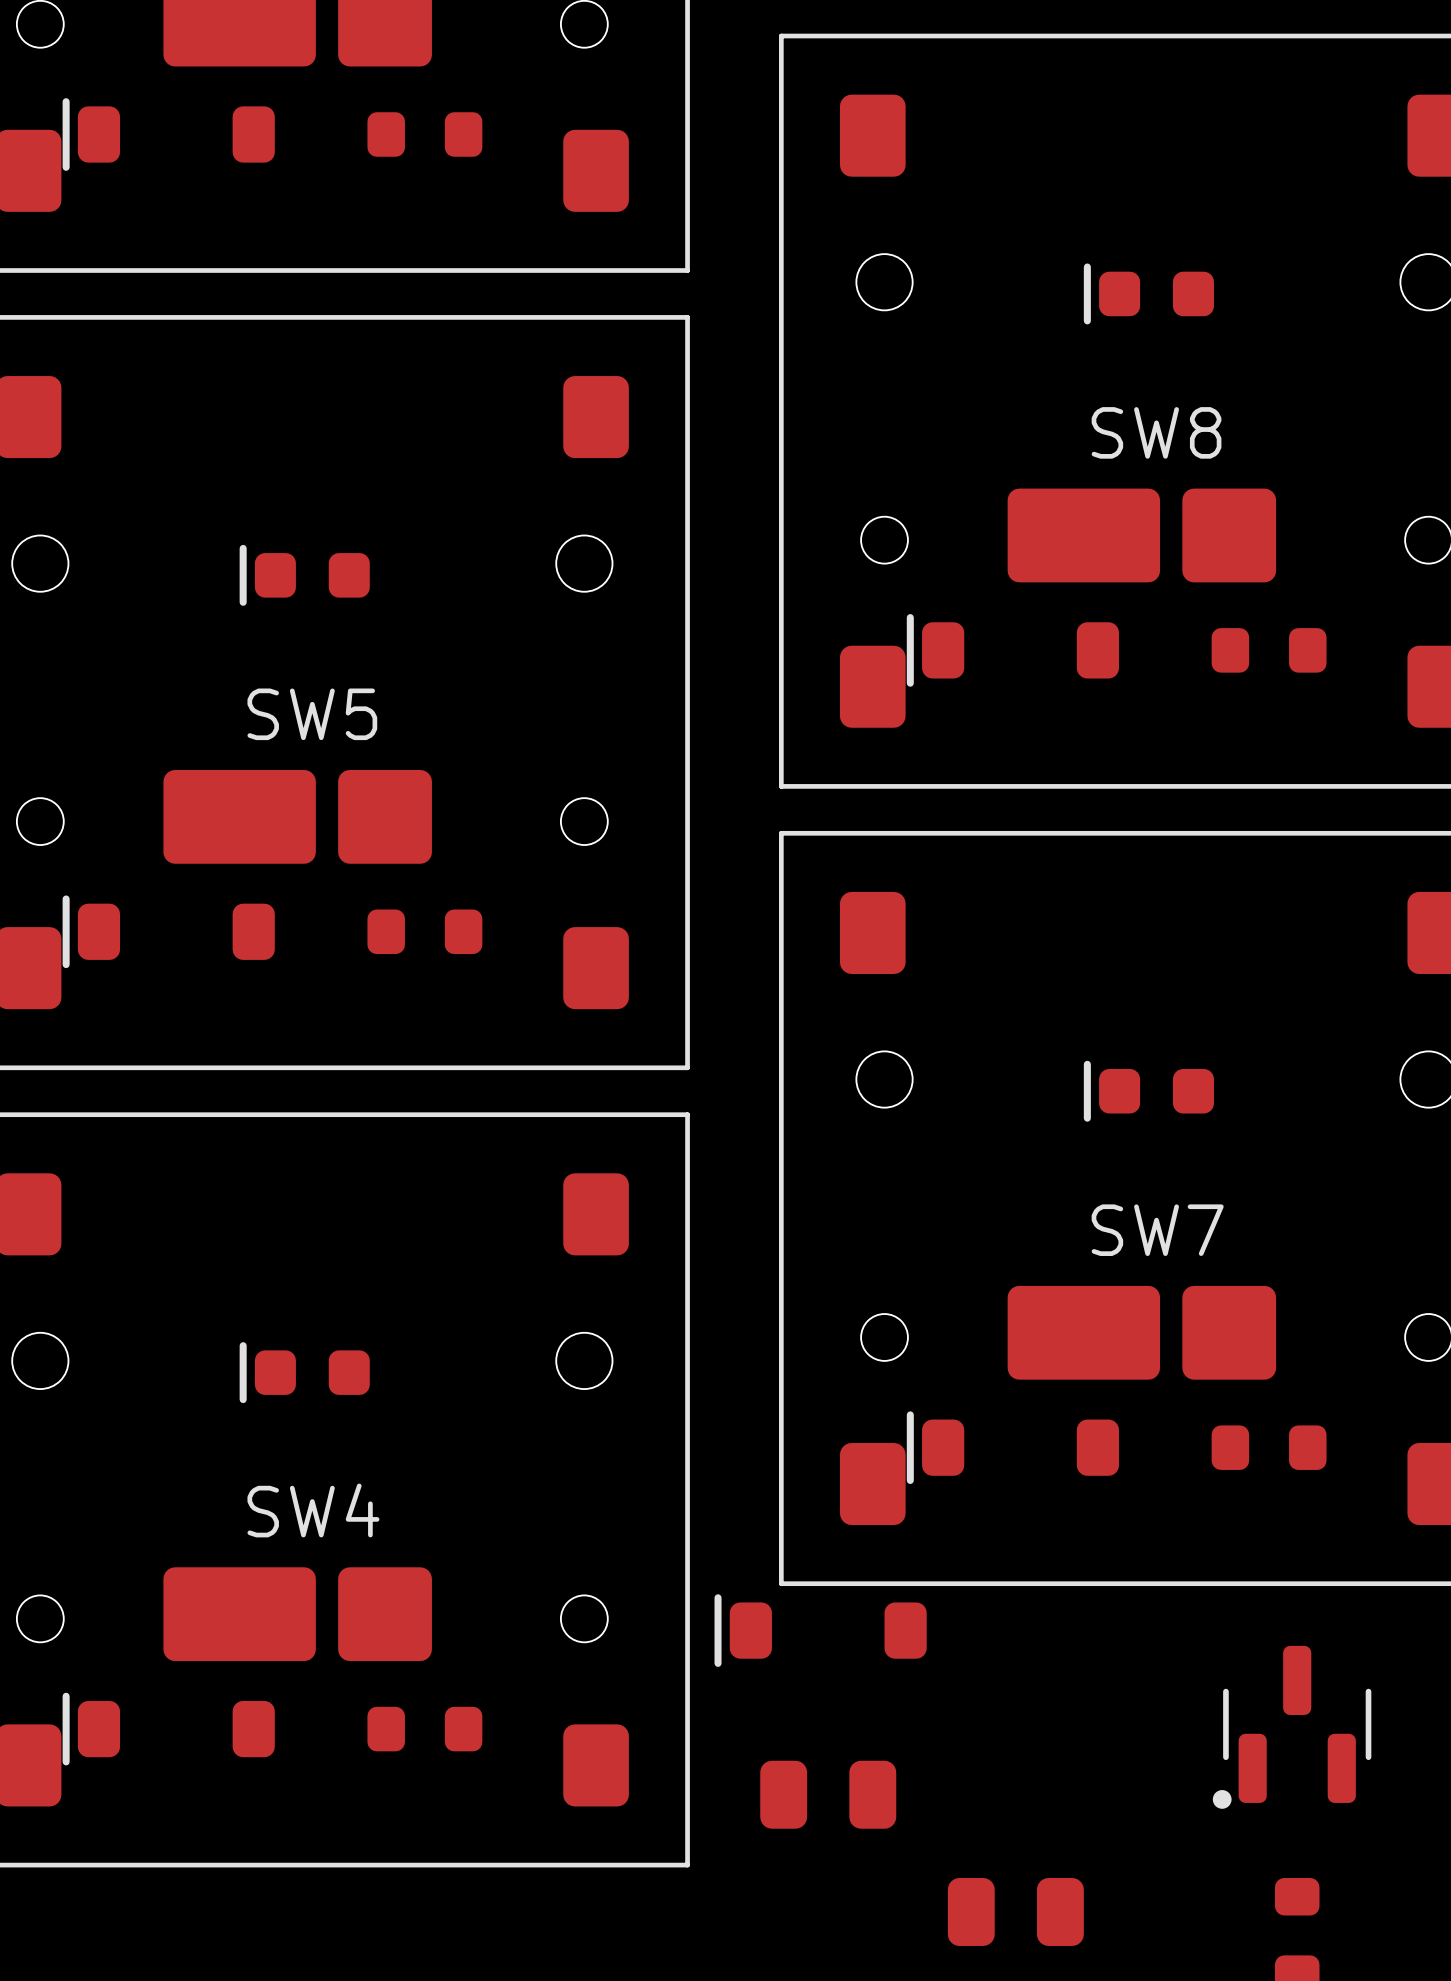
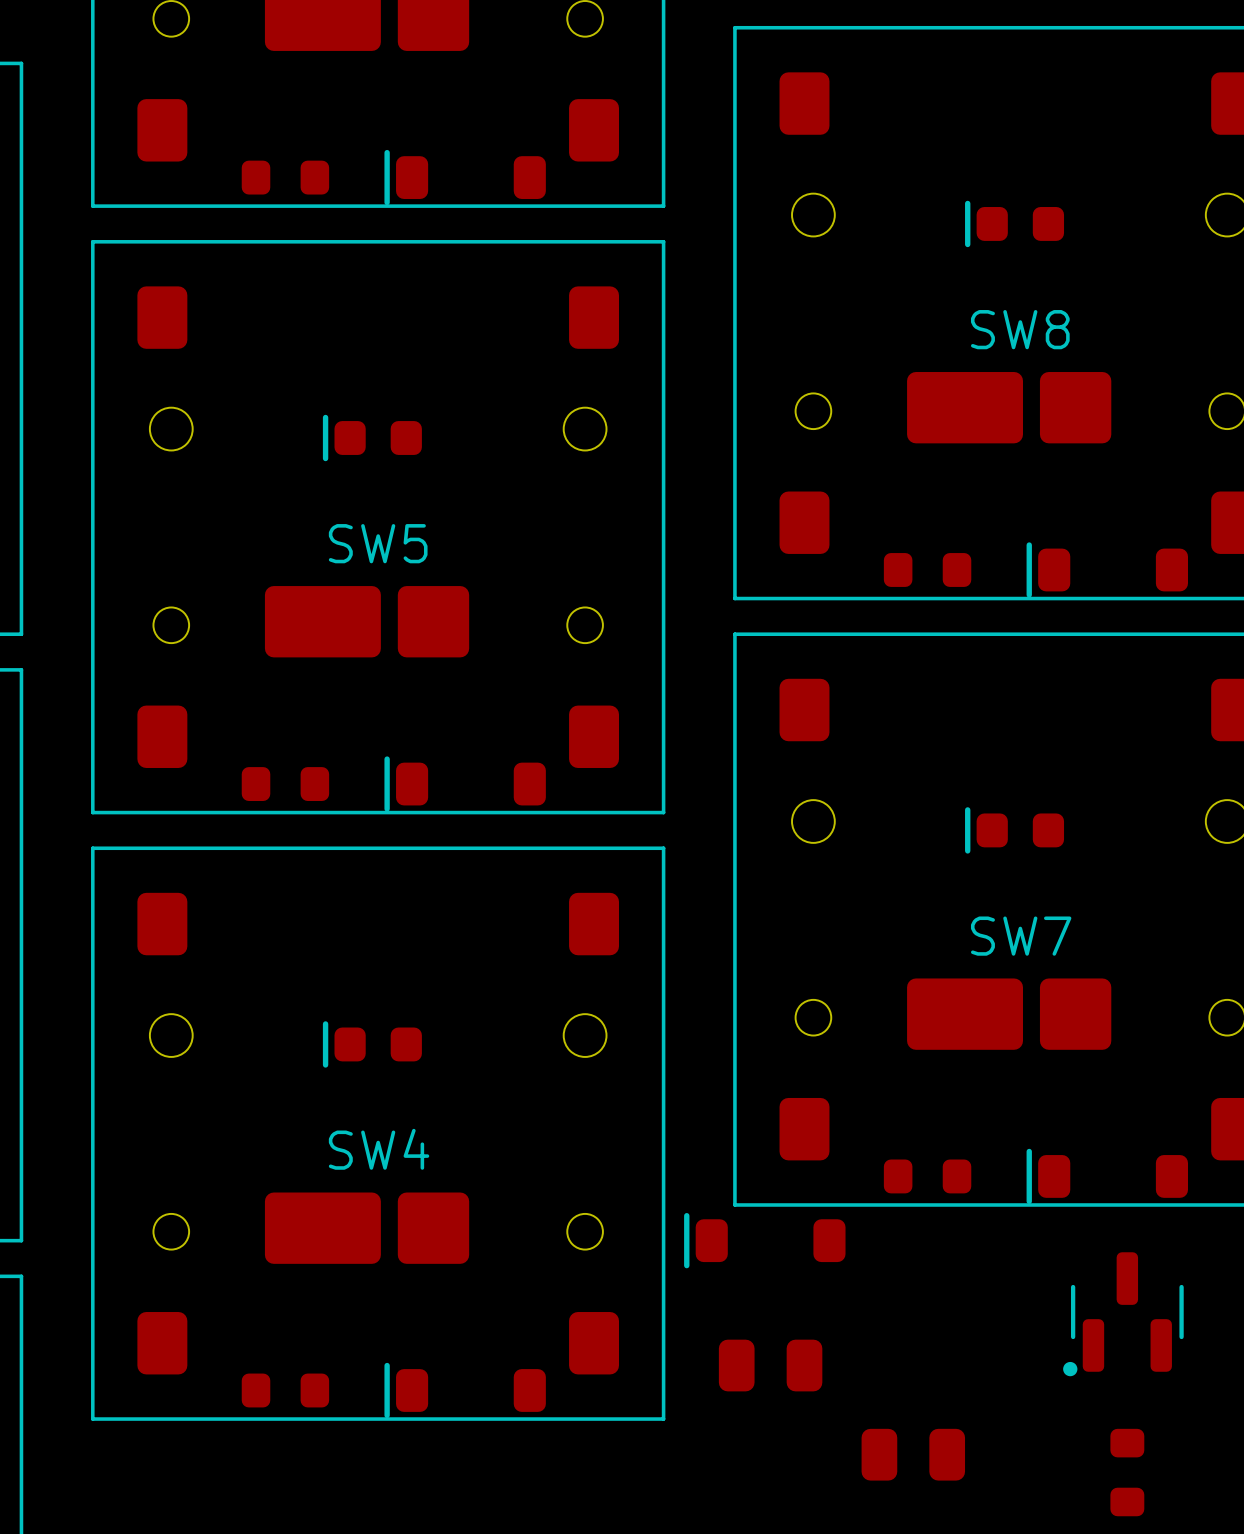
part position: (168, 134) -> (465, 177)
part position: (424, 134) -> (285, 177)
part position: (1012, 650) -> (1107, 569)
part position: (1269, 650) -> (927, 569)
part position: (168, 931) -> (465, 784)
part position: (424, 931) -> (285, 784)
part position: (1012, 1447) -> (1107, 1176)
part position: (1269, 1447) -> (927, 1176)
part position: (168, 1729) -> (465, 1390)
part position: (424, 1729) -> (285, 1390)

